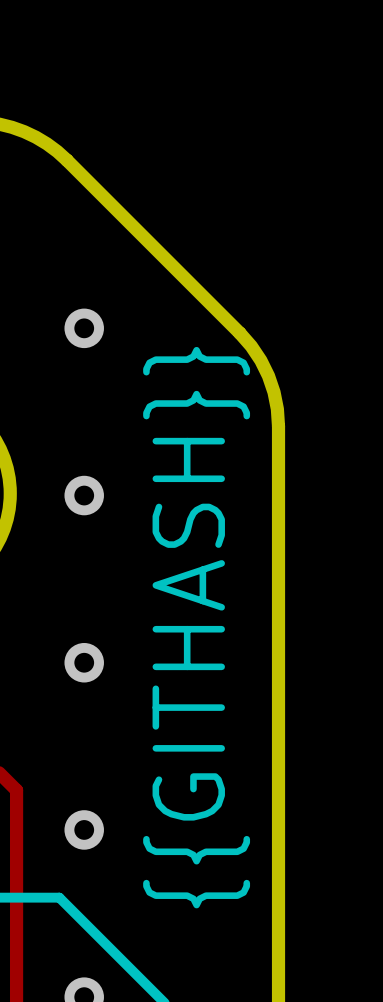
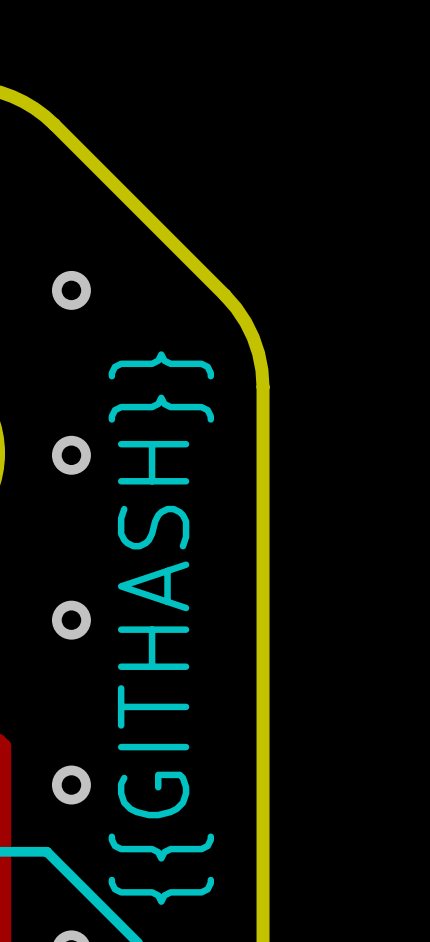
text position: {{GITHASH}} (196, 627) -> {{GITHASH}} (161, 628)

